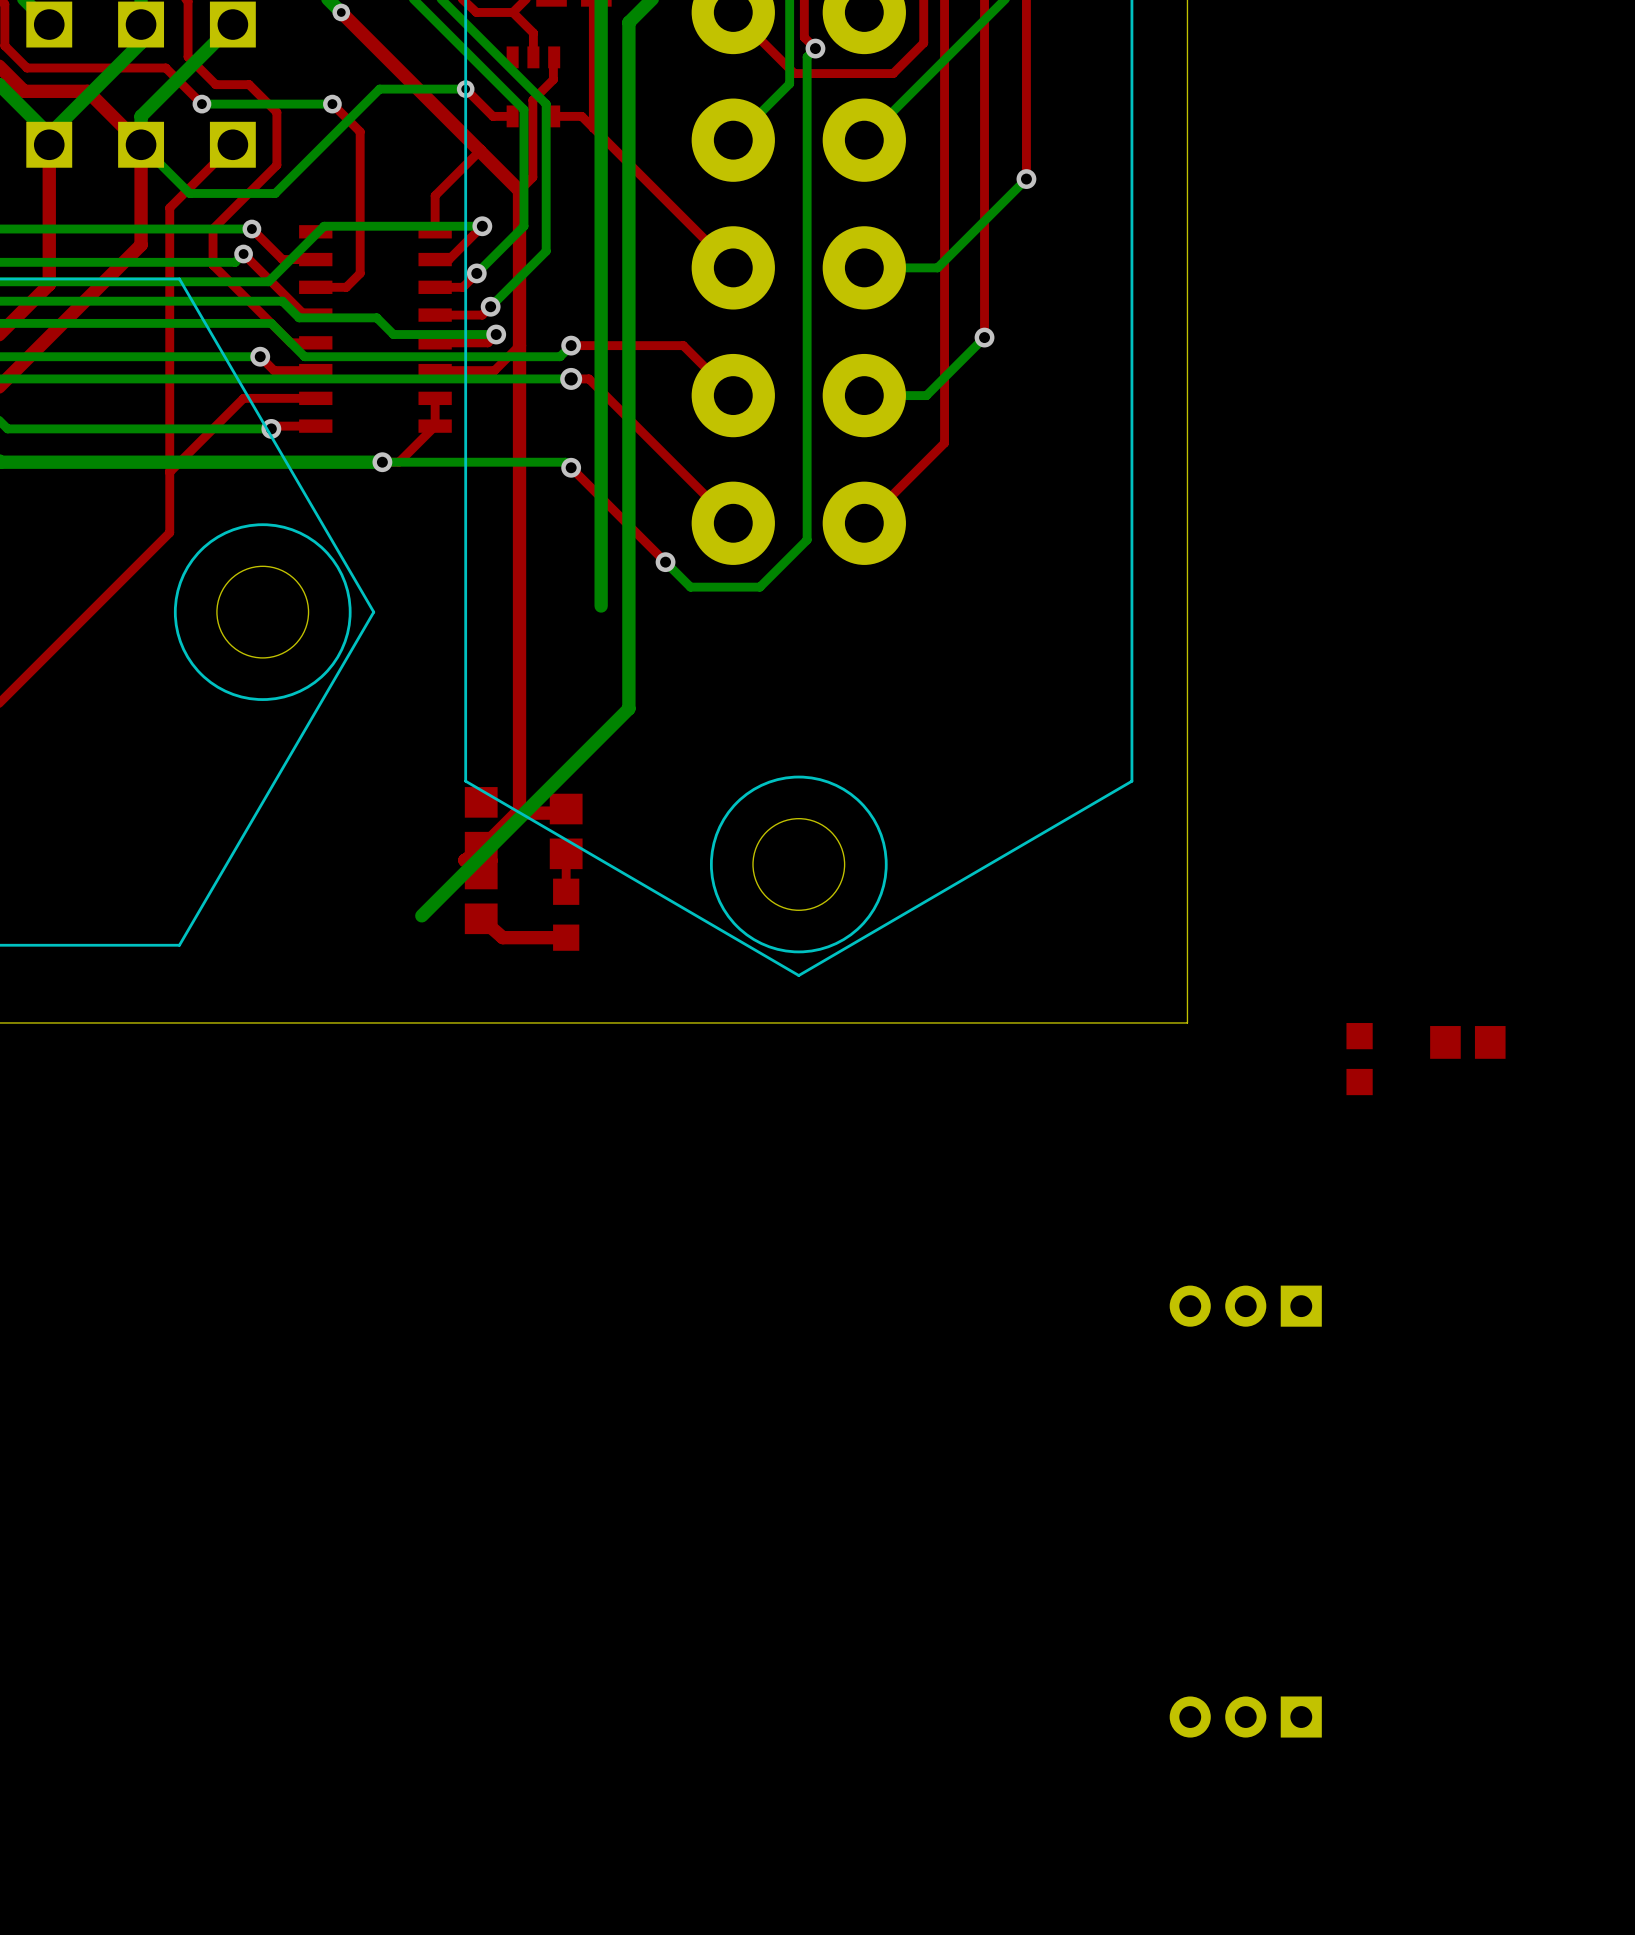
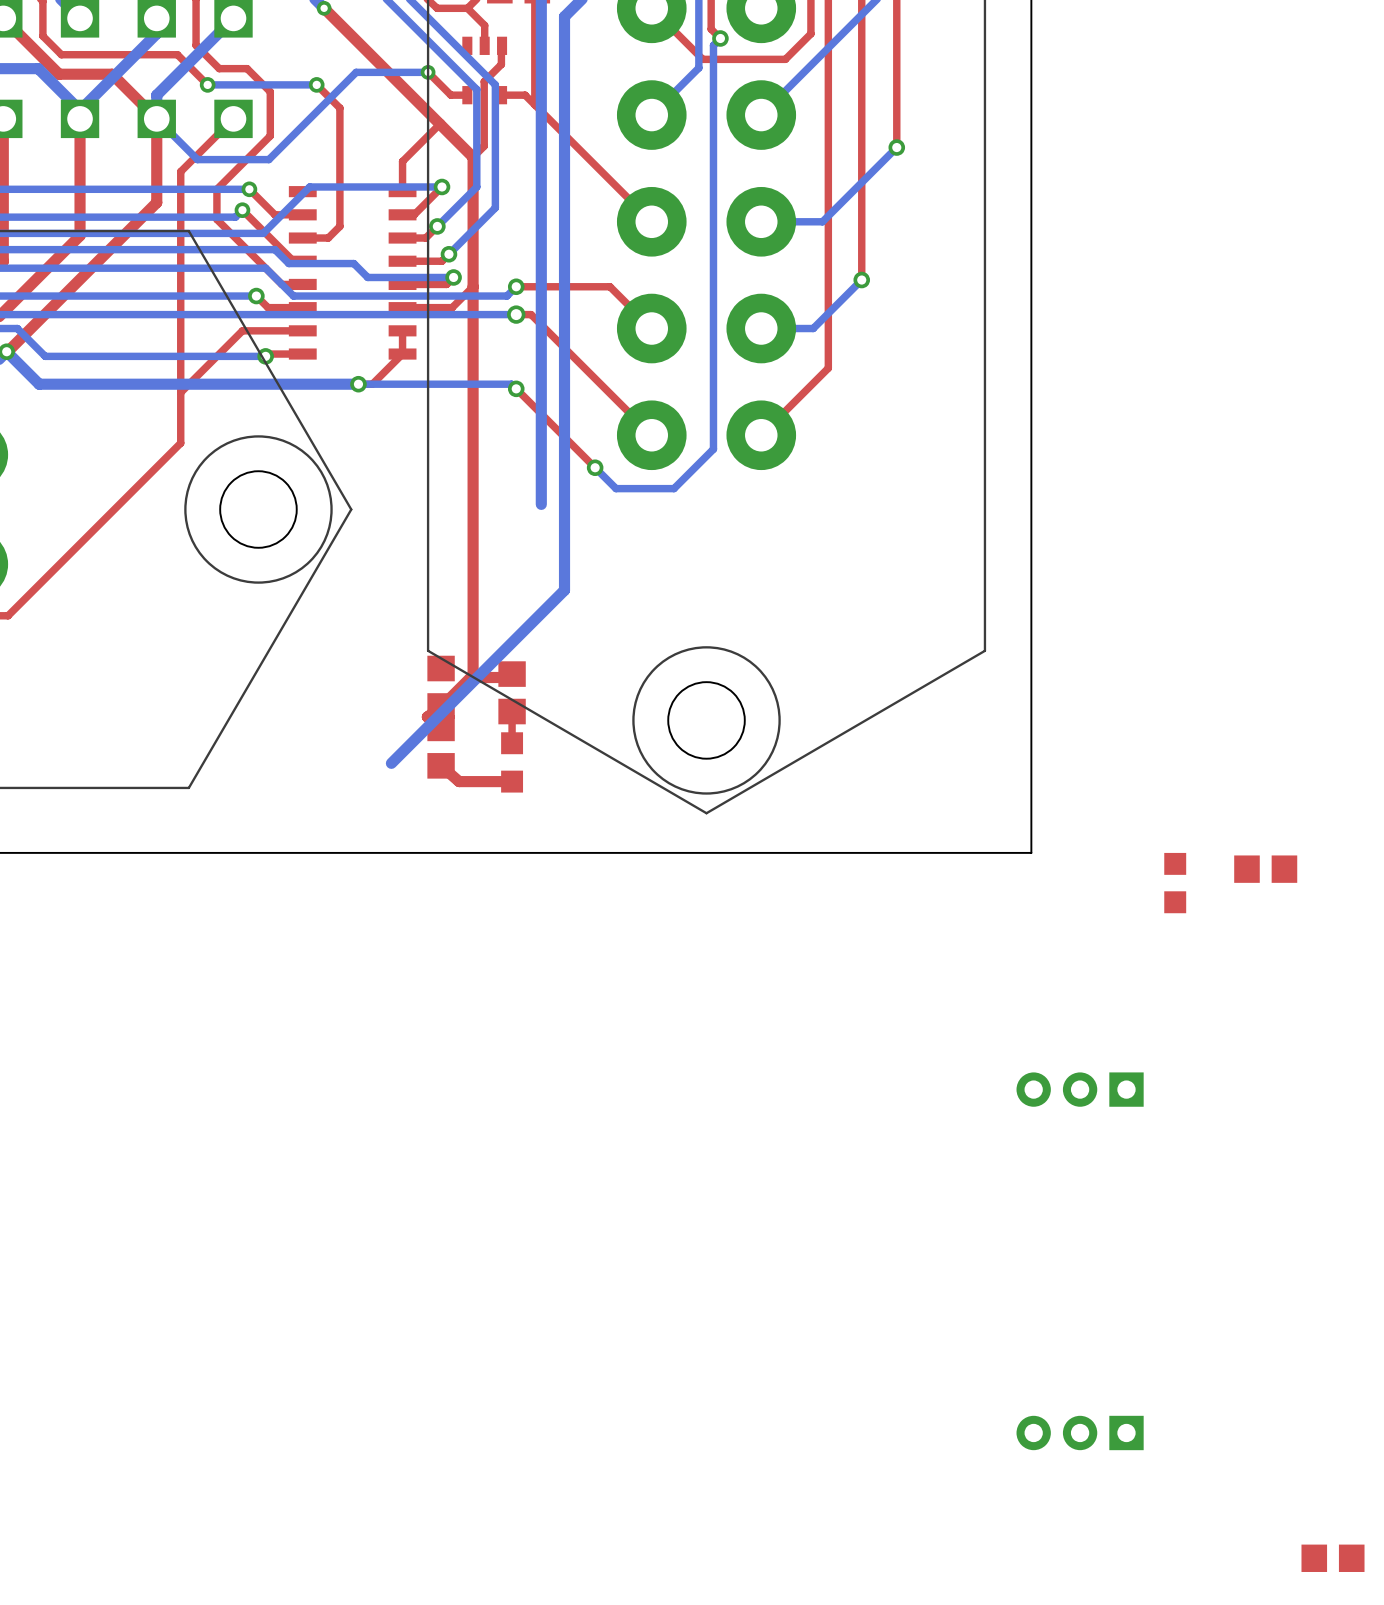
part: none -> (1333, 1558)

